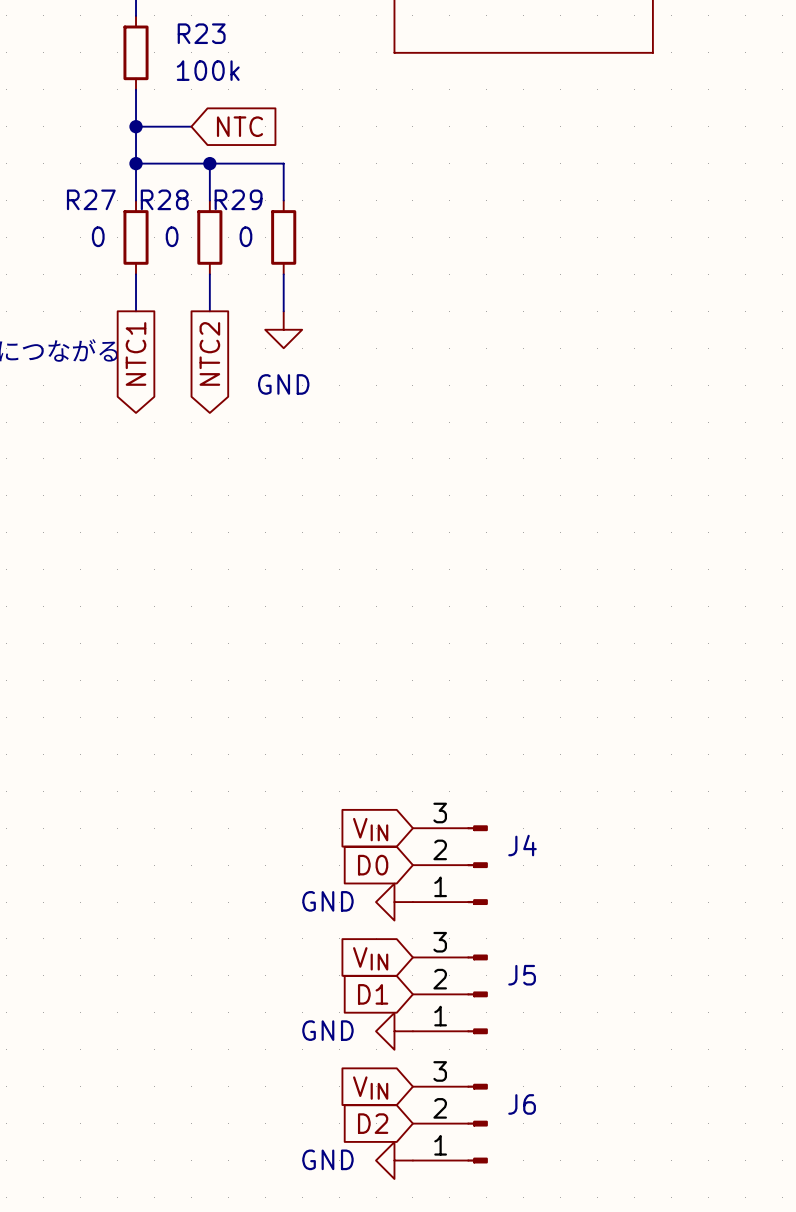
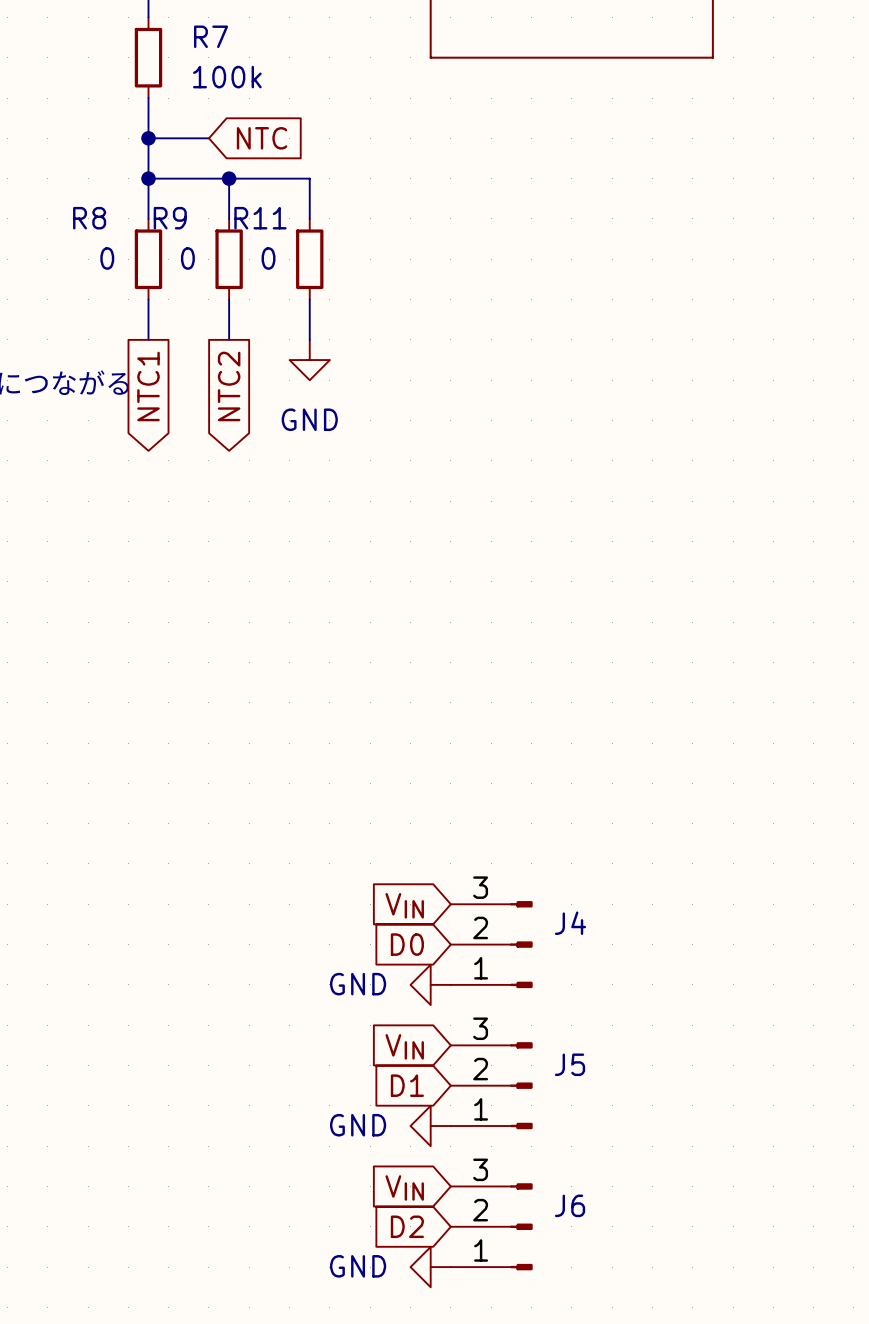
R23 name: R23 (201, 33) -> R7 (211, 36)
R27 name: R27 (91, 199) -> R8 (89, 218)
R28 name: R28 (164, 199) -> R9 (170, 218)
R29 name: R29 (238, 199) -> R11 (260, 218)

